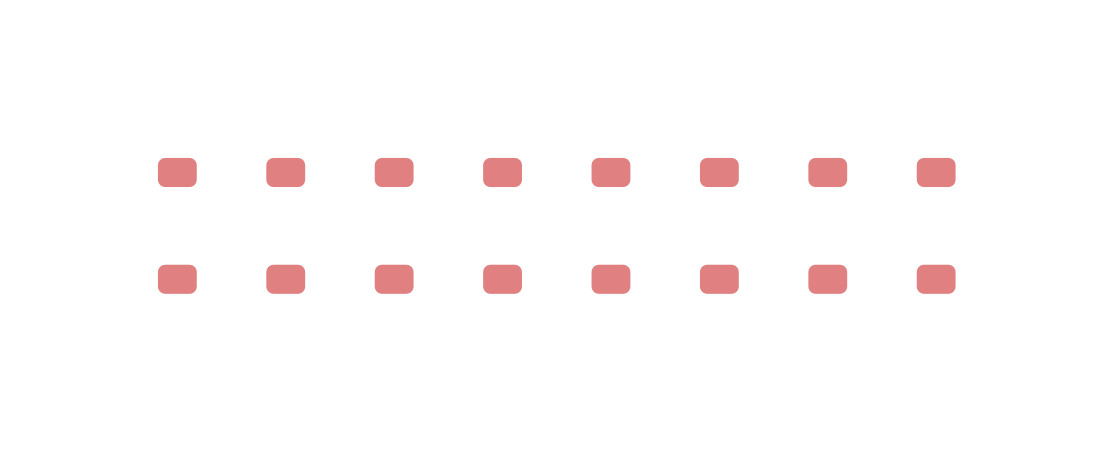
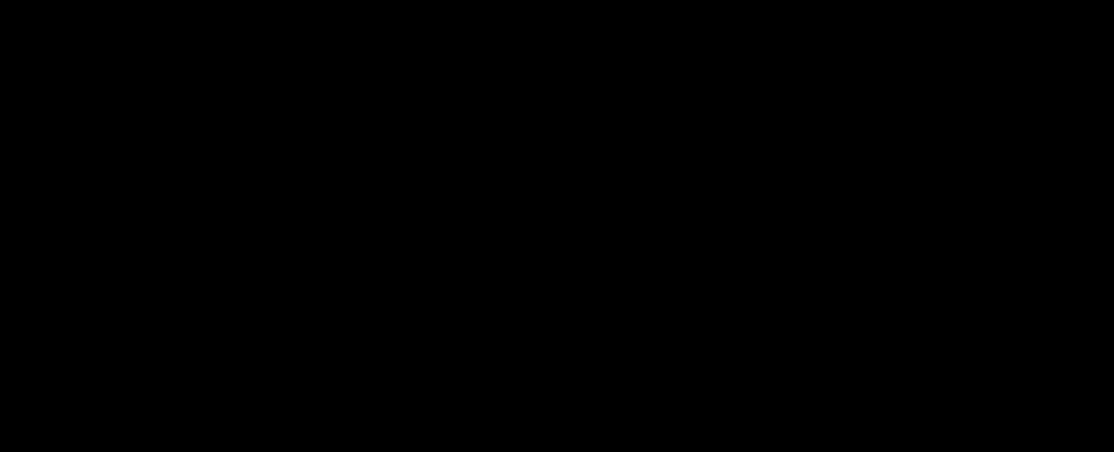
part: (177, 225) -> none
part: (285, 225) -> none
part: (394, 225) -> none
part: (502, 225) -> none
part: (610, 225) -> none
part: (719, 225) -> none
part: (827, 225) -> none
part: (936, 225) -> none

